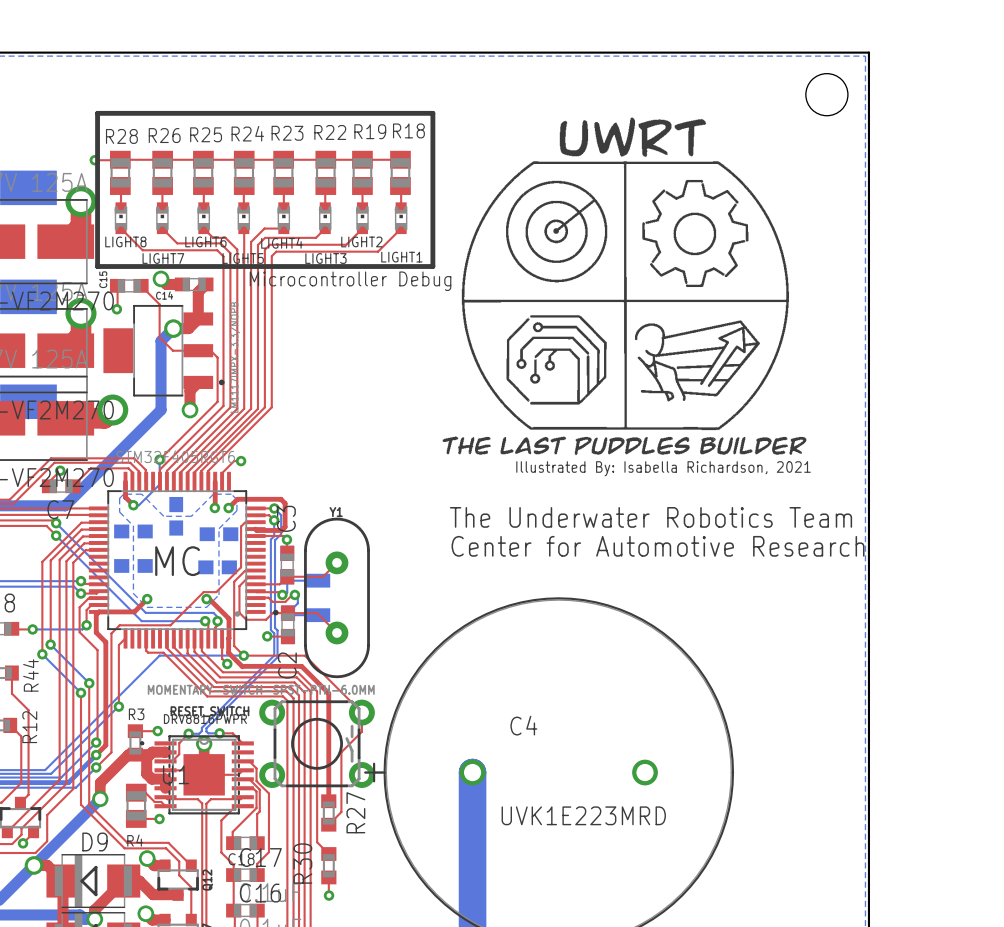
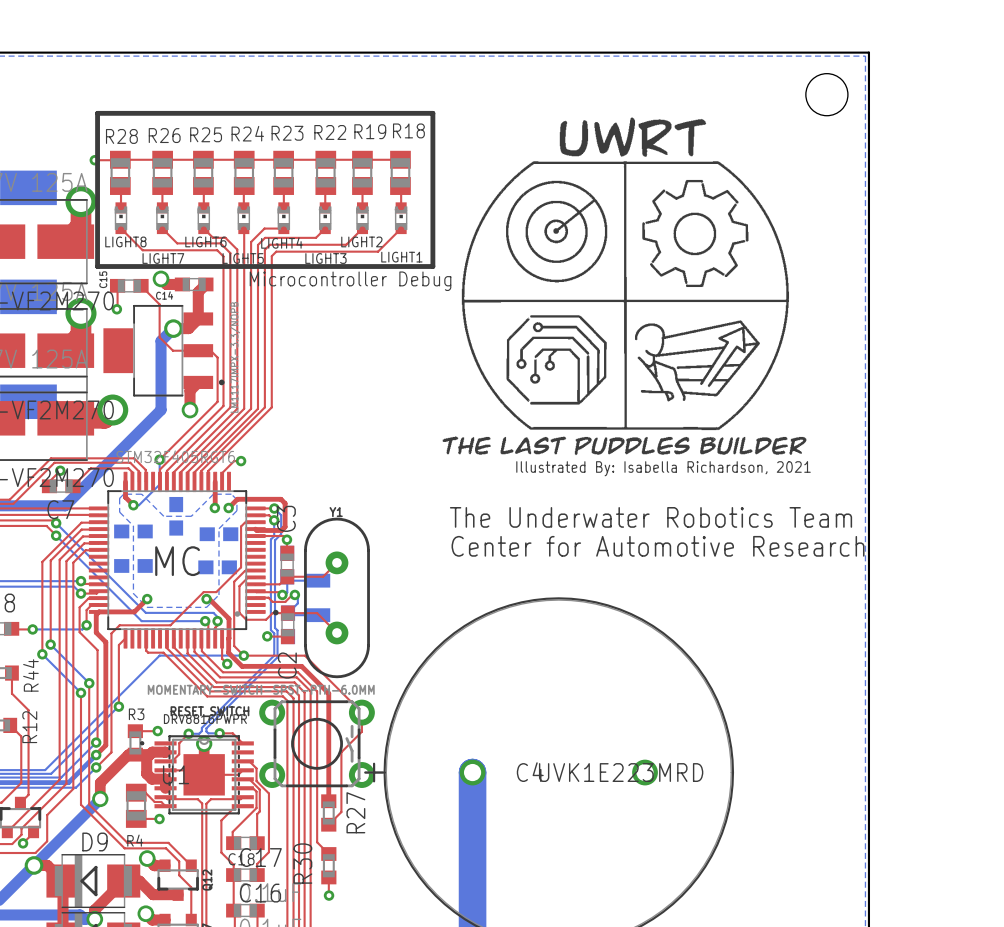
C4 name position: C4 (523, 725) -> C4 (530, 772)
C4 value position: UVK1E223MRD (583, 815) -> UVK1E223MRD (621, 772)

